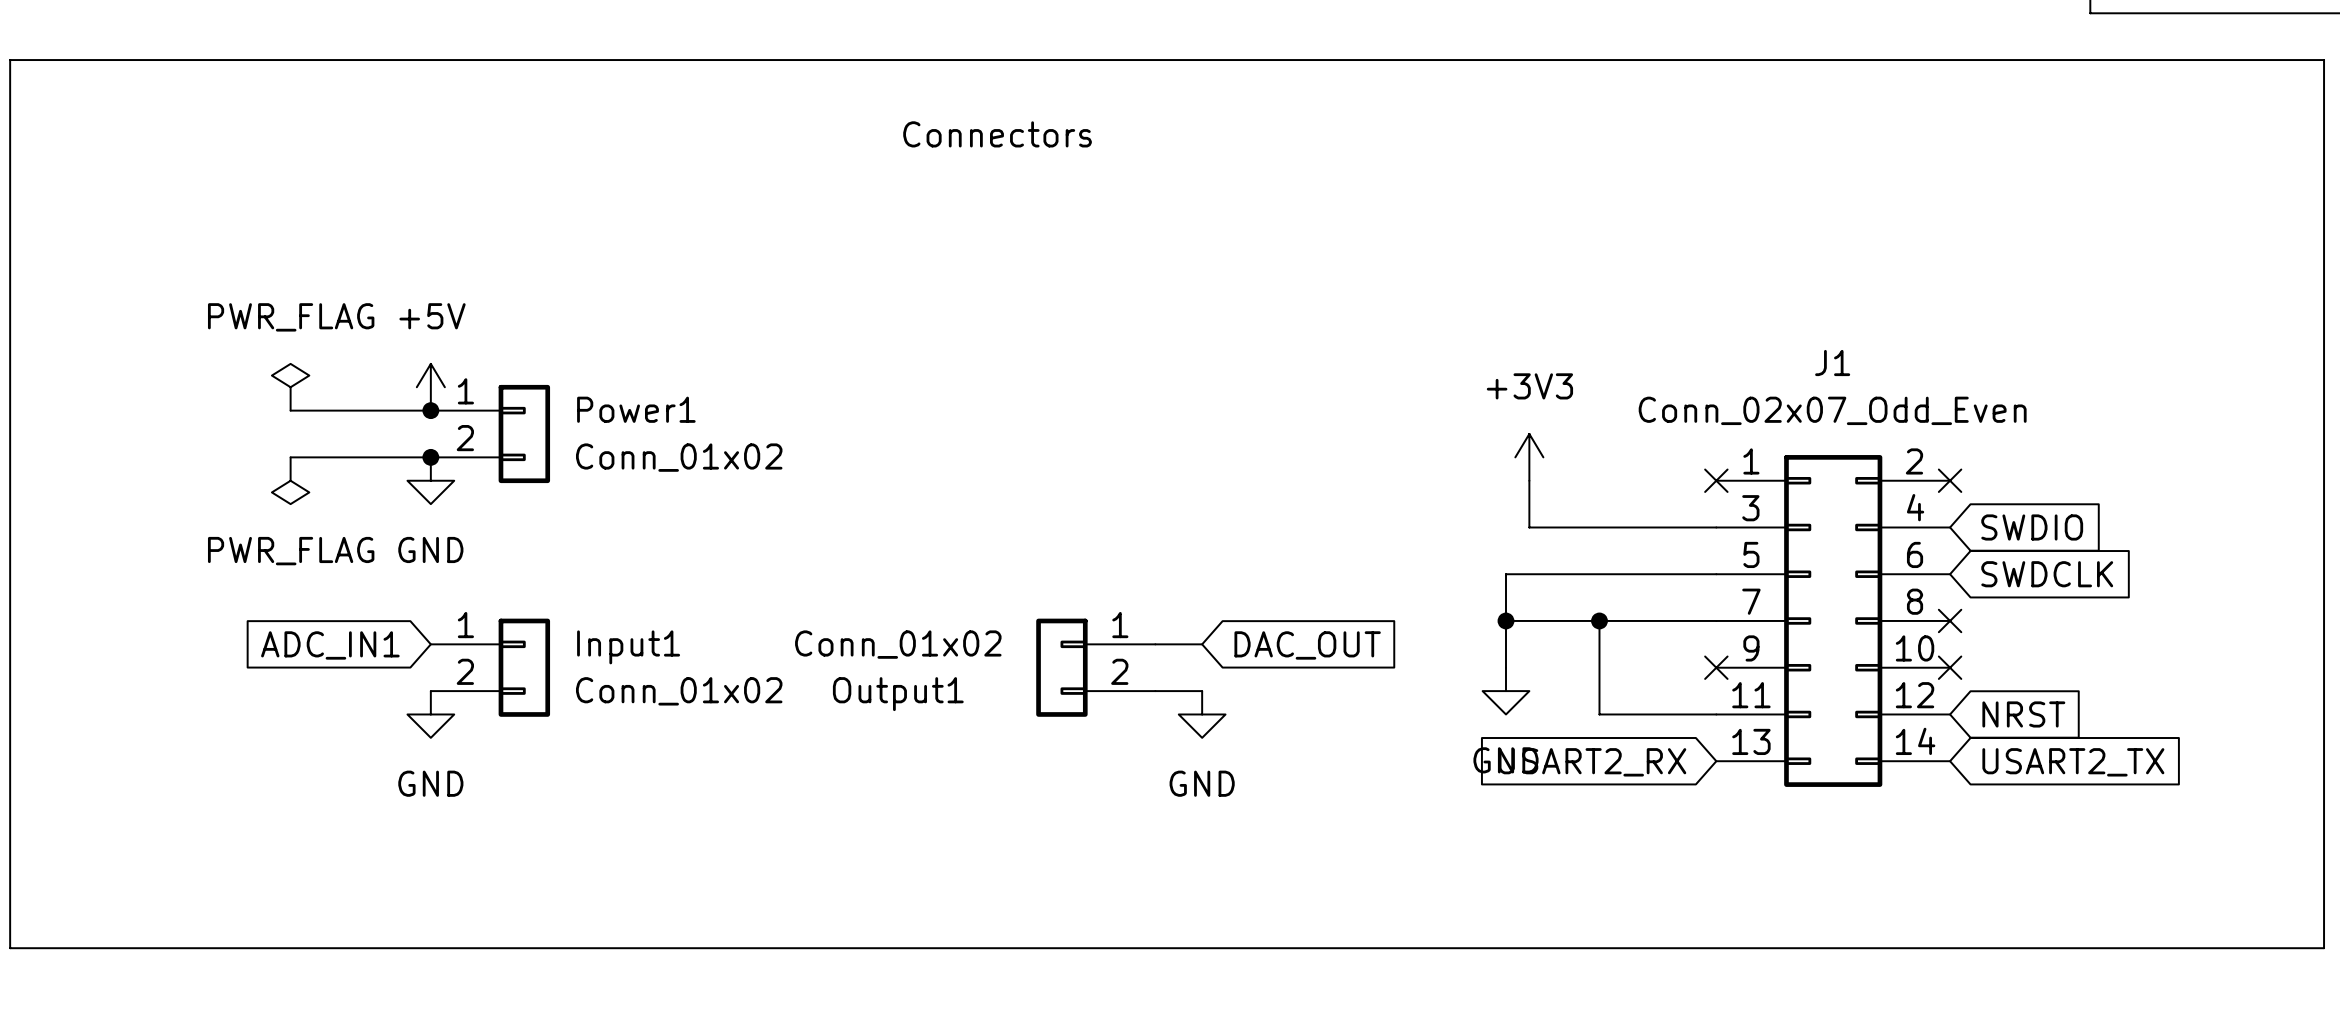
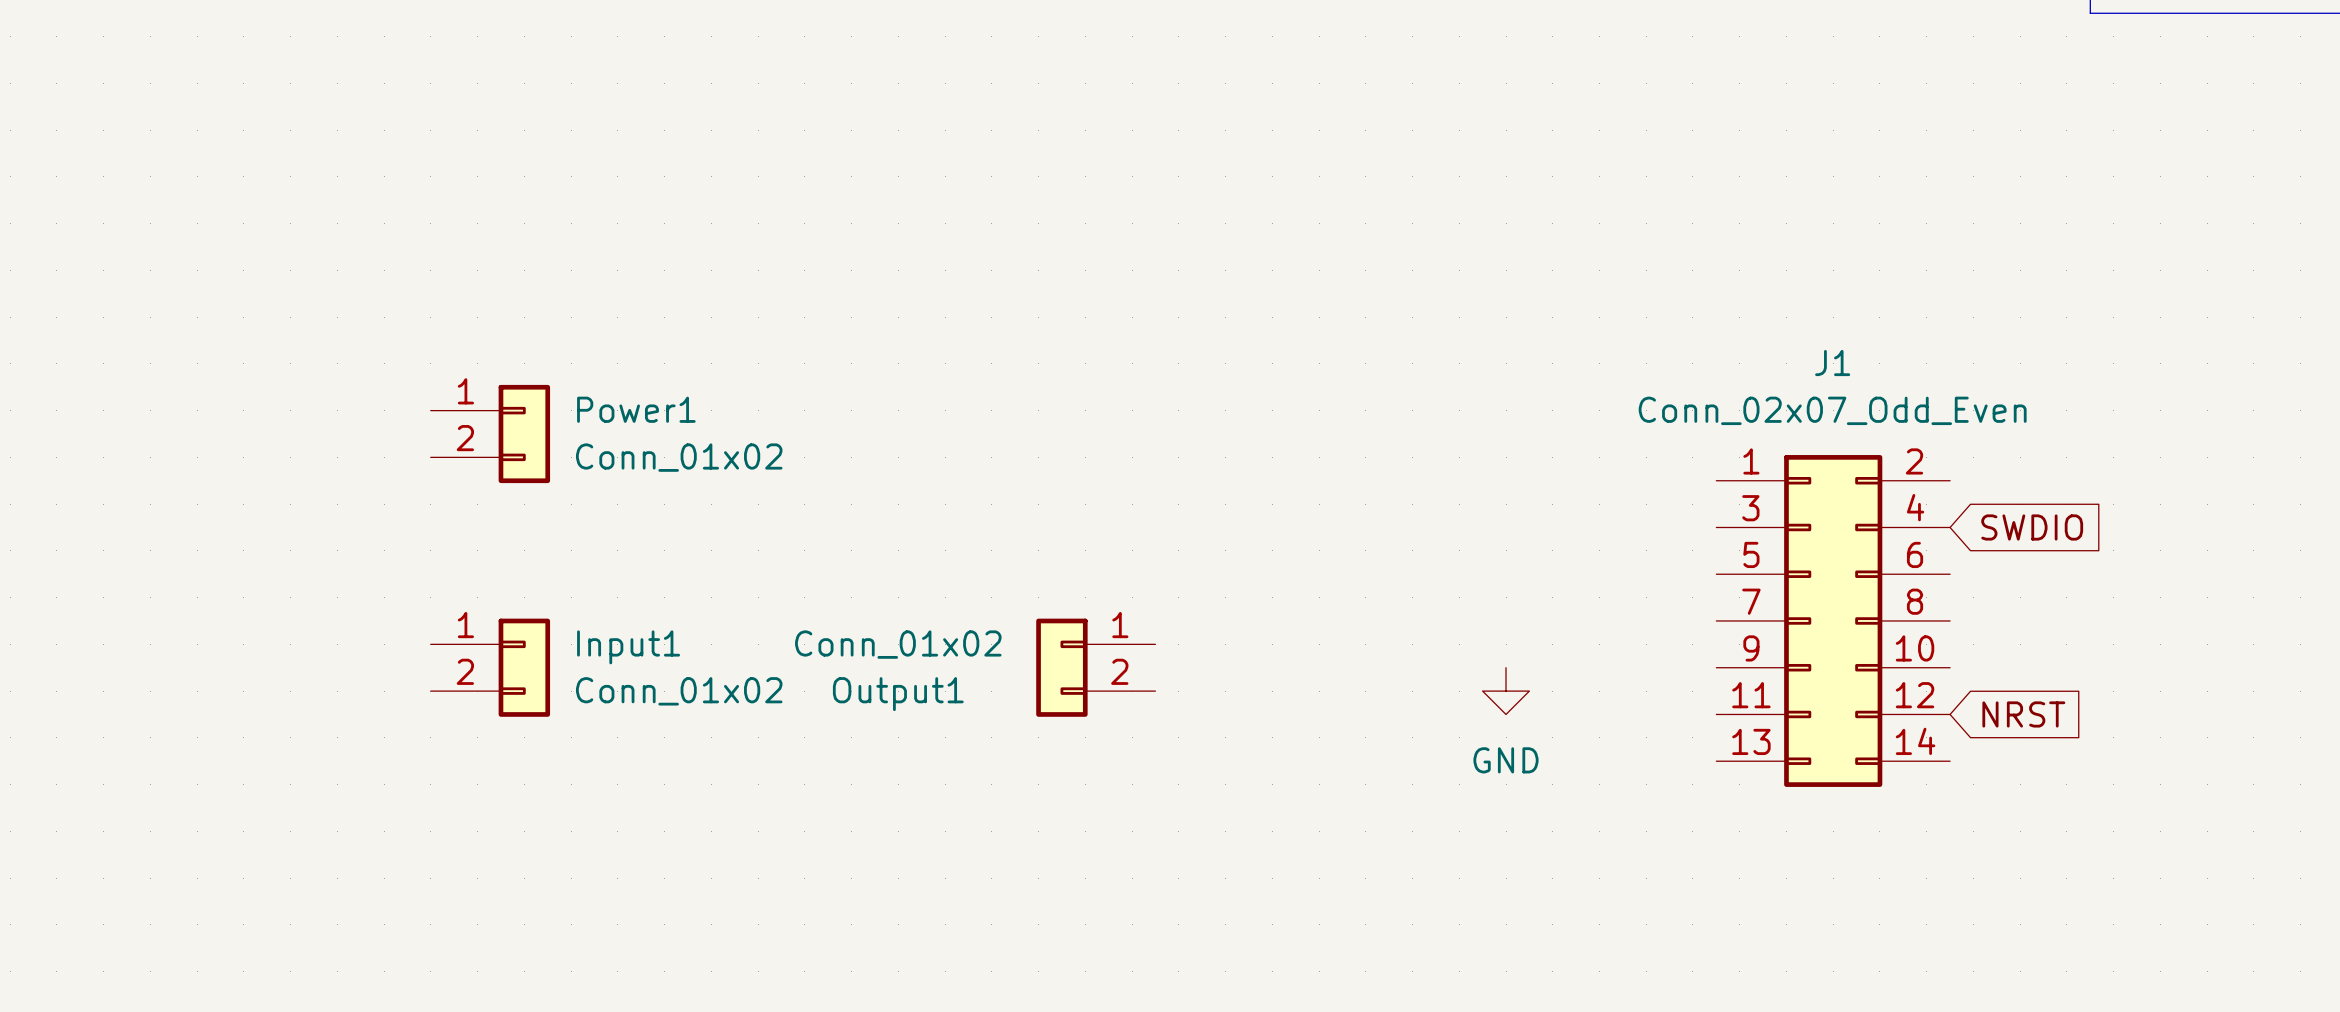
line: (10, 60) (2324, 60) (2324, 948) (10, 948) (10, 60) -> none
text: Connectors (997, 134) -> none
power symbol: PWR_FLAG (290, 387) -> none
power symbol: +5V (430, 387) -> none
wire: (290, 410) (430, 410) -> none
junction: (430, 410) -> none
wire: (290, 457) (430, 457) -> none
junction: (430, 457) -> none
power symbol: +3V3 (1529, 457) -> none
power symbol: PWR_FLAG (290, 480) -> none
power symbol: GND (430, 480) -> none
wire: (1529, 480) (1529, 527) (1716, 527) -> none
no-connect mark: (1716, 480) -> none
no-connect mark: (1950, 480) -> none
wire: (1716, 574) (1506, 574) (1506, 667) -> none
global label: SWDCLK (2047, 574) -> none
wire: (1506, 620) (1716, 620) -> none
junction: (1506, 620) -> none
wire: (1599, 620) (1599, 714) (1716, 714) -> none
junction: (1599, 620) -> none
no-connect mark: (1950, 620) -> none
wire: (1155, 644) (1202, 644) -> none
global label: ADC_IN1 (330, 645) -> none
global label: DAC_OUT (1307, 645) -> none
no-connect mark: (1716, 667) -> none
no-connect mark: (1950, 667) -> none
wire: (1155, 691) (1202, 691) -> none
power symbol: GND (430, 714) -> none
power symbol: GND (1202, 714) -> none
global label: USART2_RX (1592, 762) -> none
global label: USART2_TX (2073, 762) -> none

